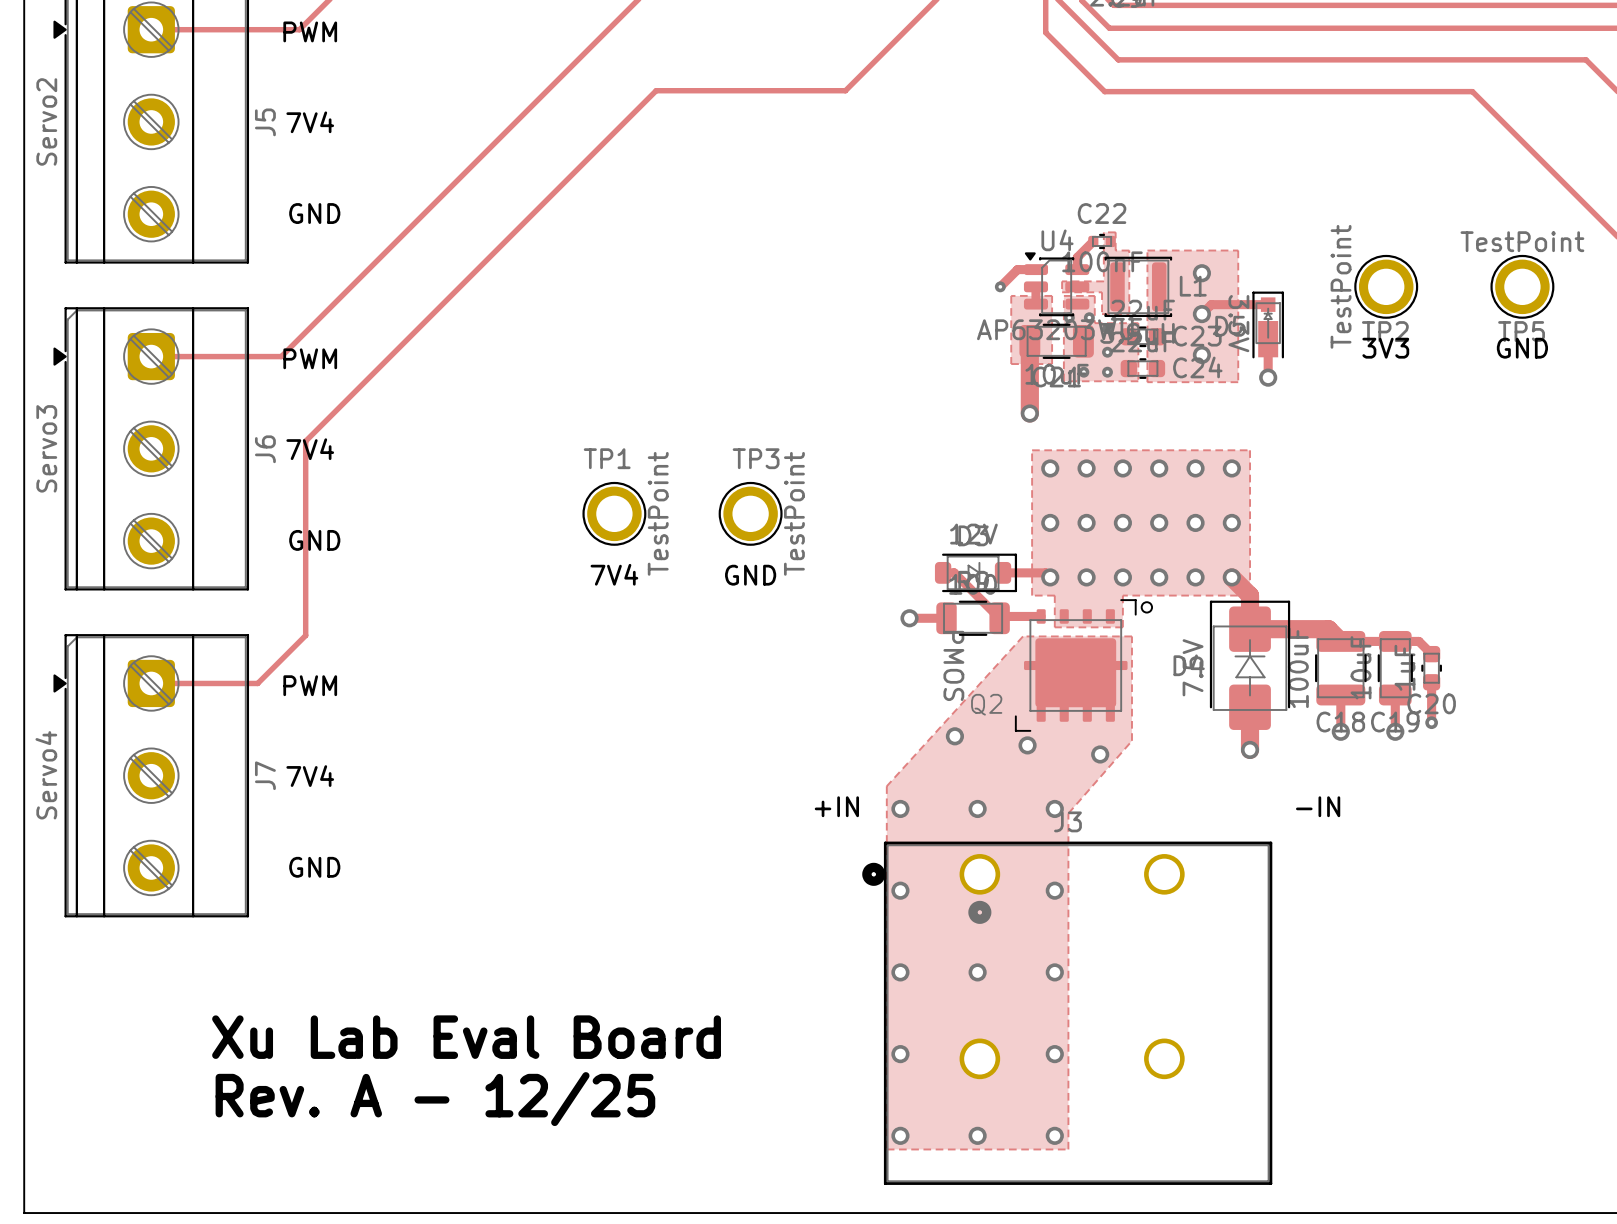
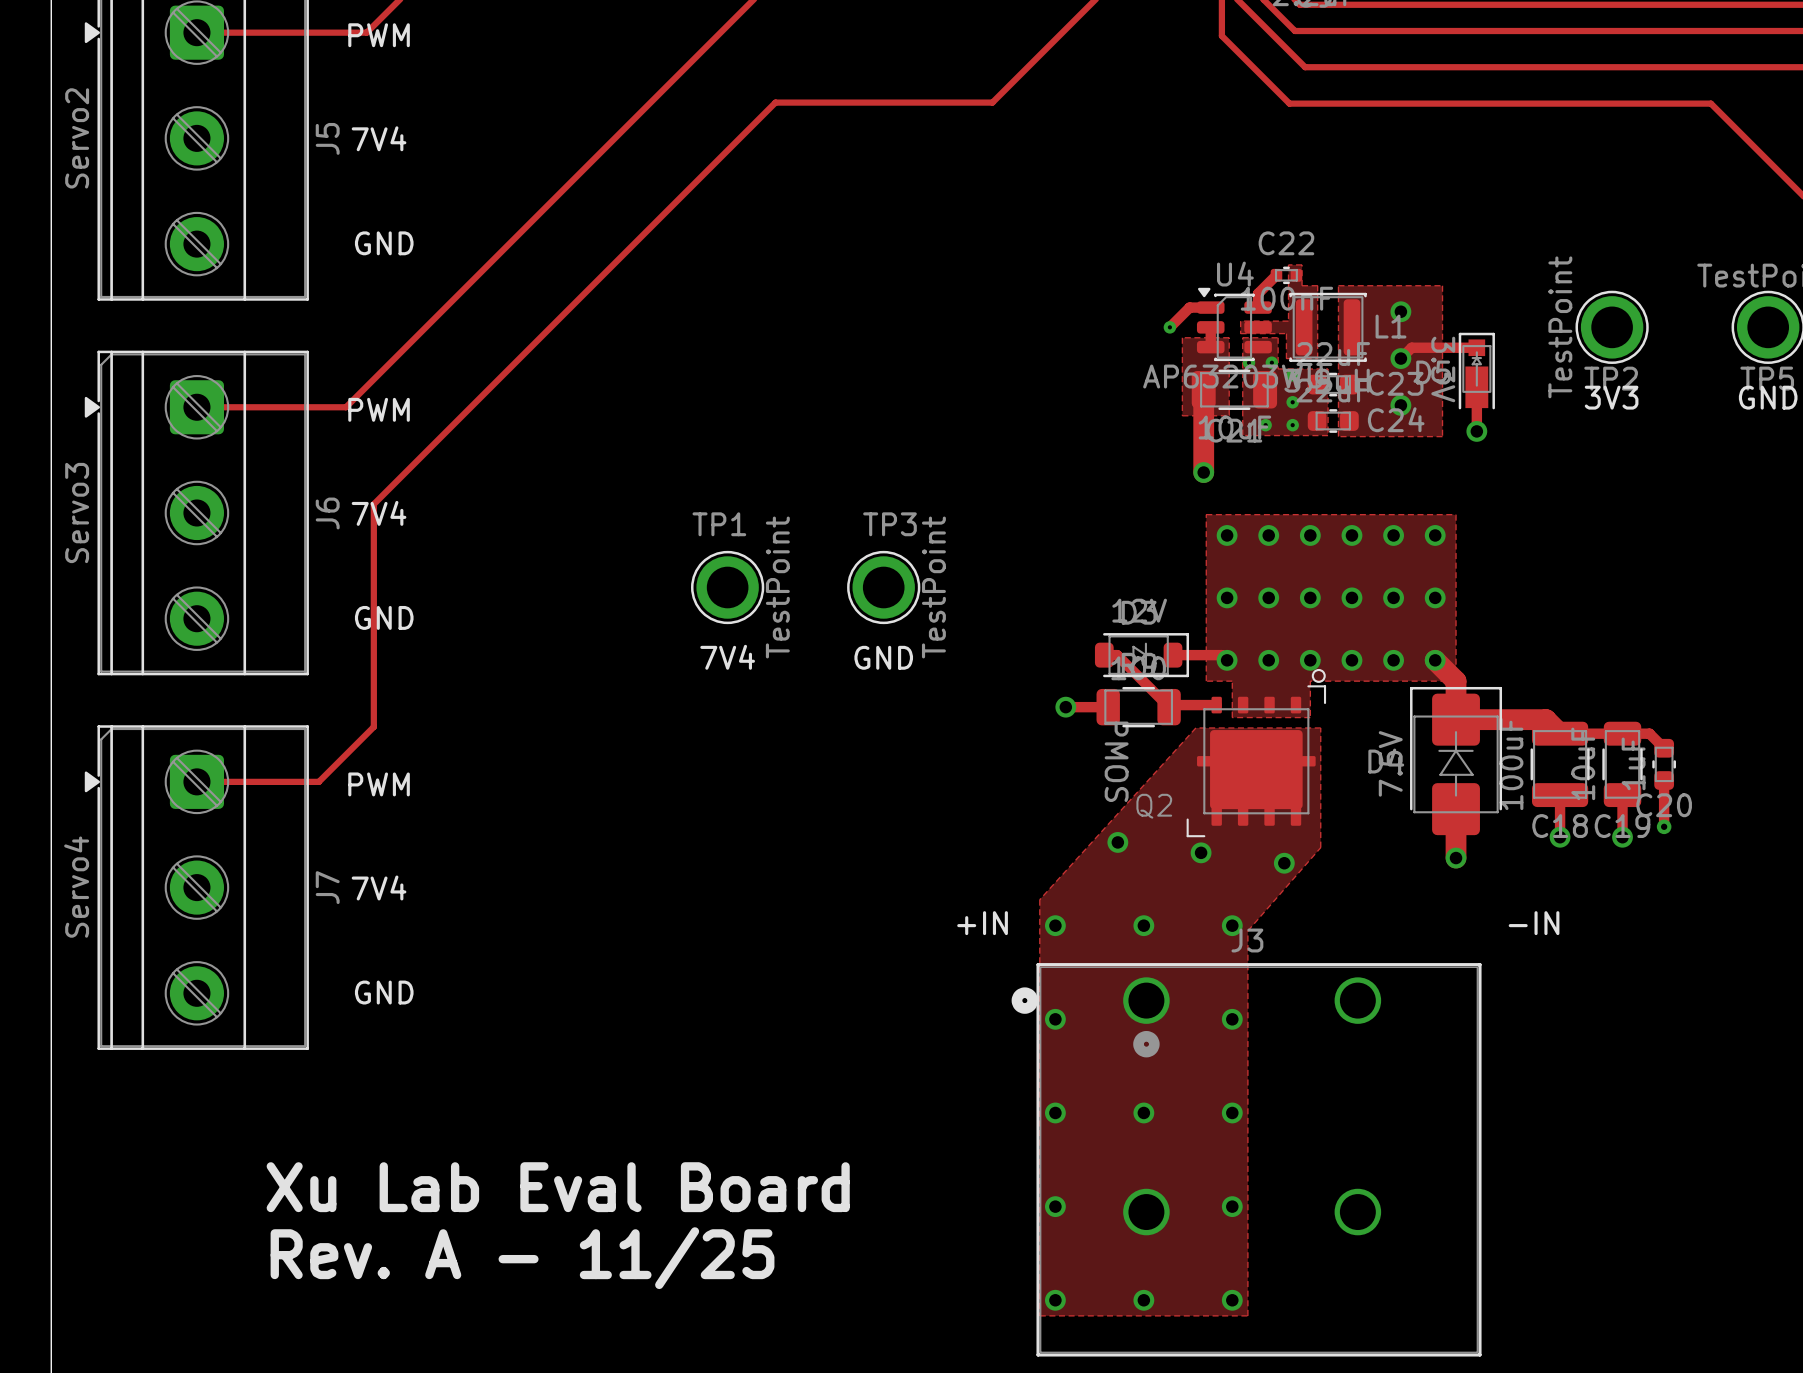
Q2 footprint: [1014, 599, 1153, 732] -> [1186, 668, 1327, 838]
text: Rev. A - 12/25 (435, 1099) -> Rev. A - 11/25 (522, 1258)

